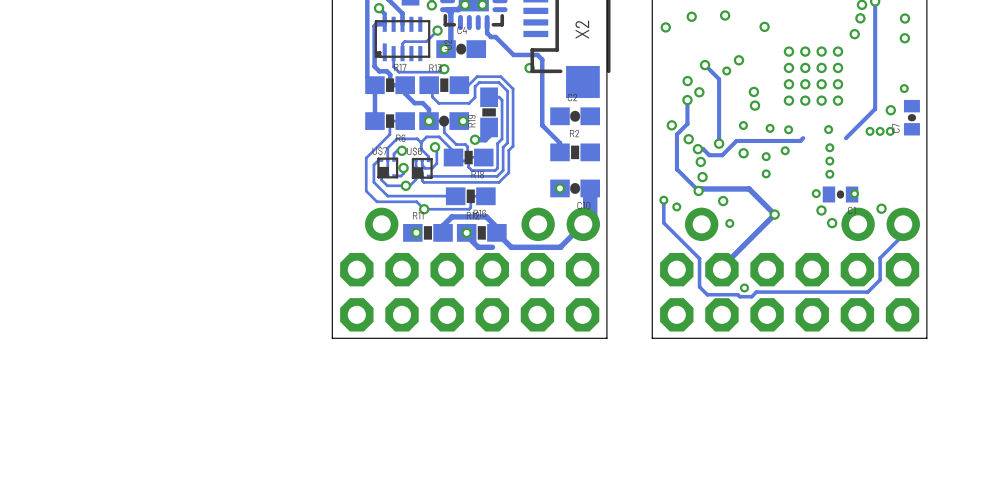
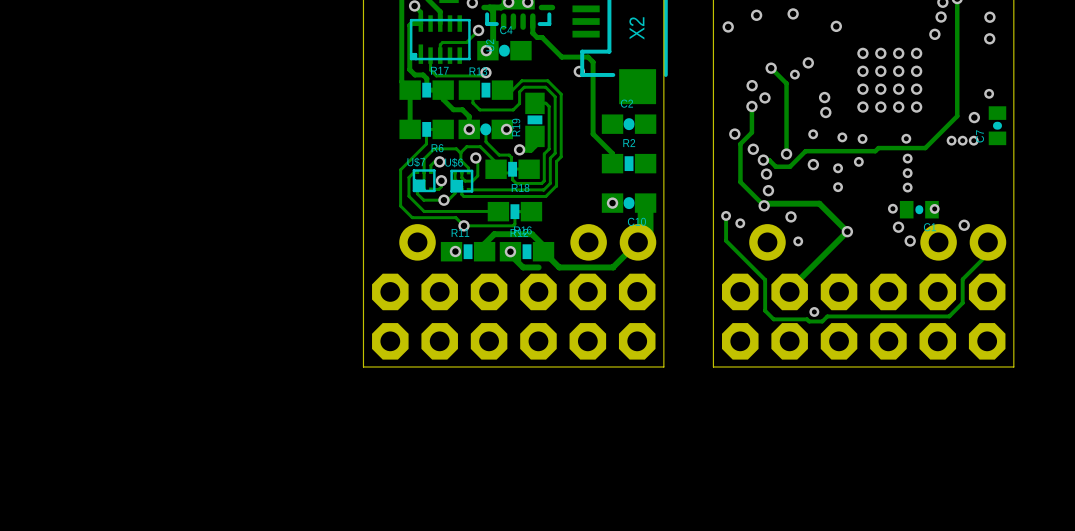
track: none -> (925, 148) (878, 148)

